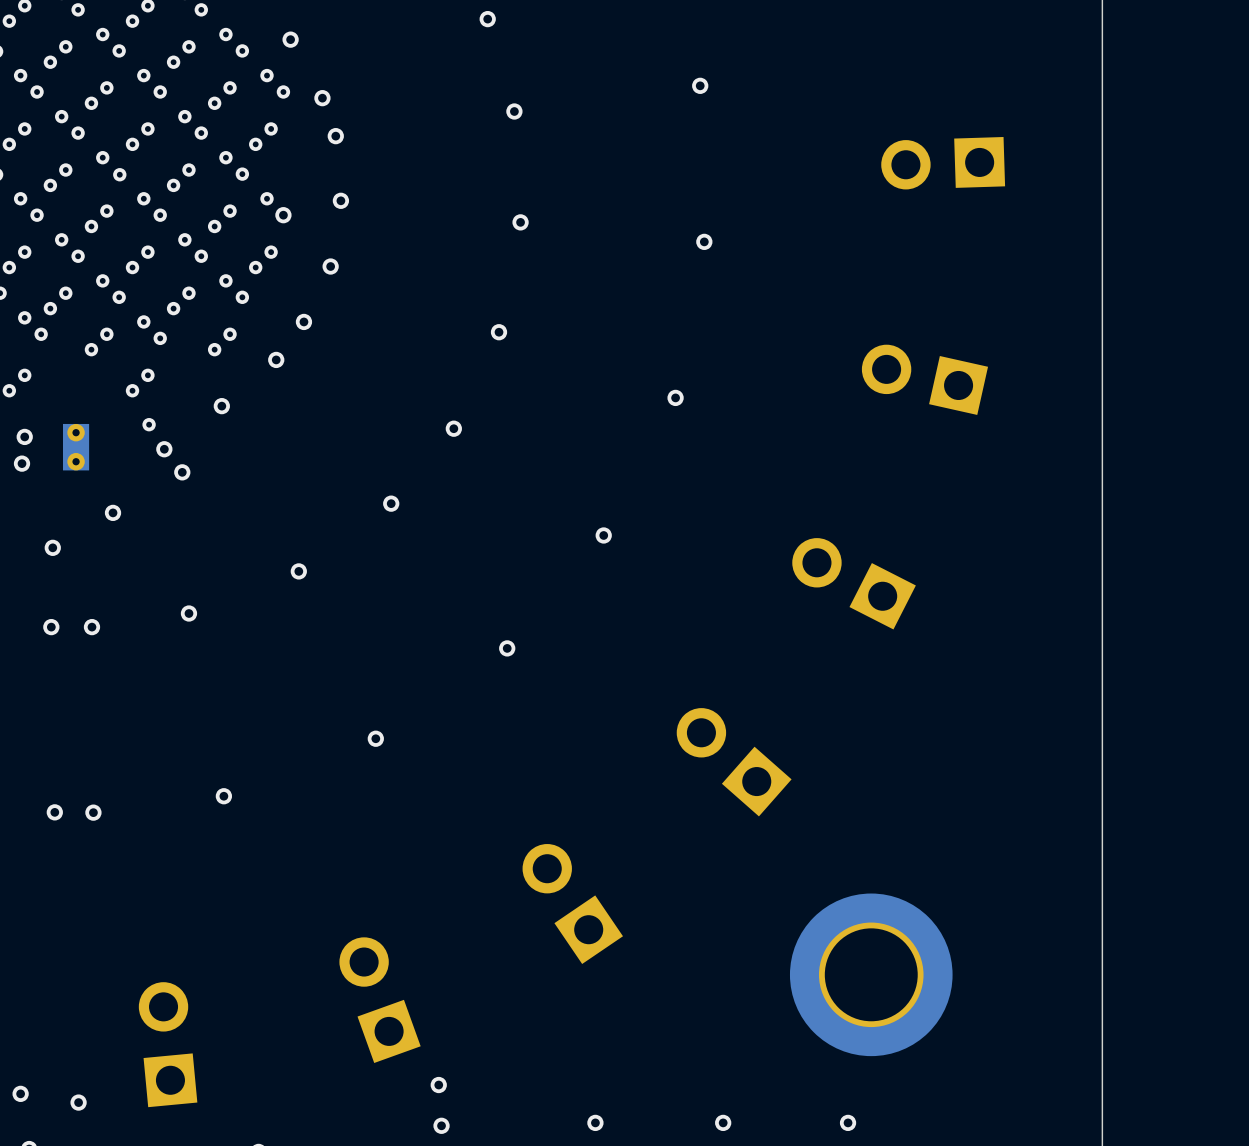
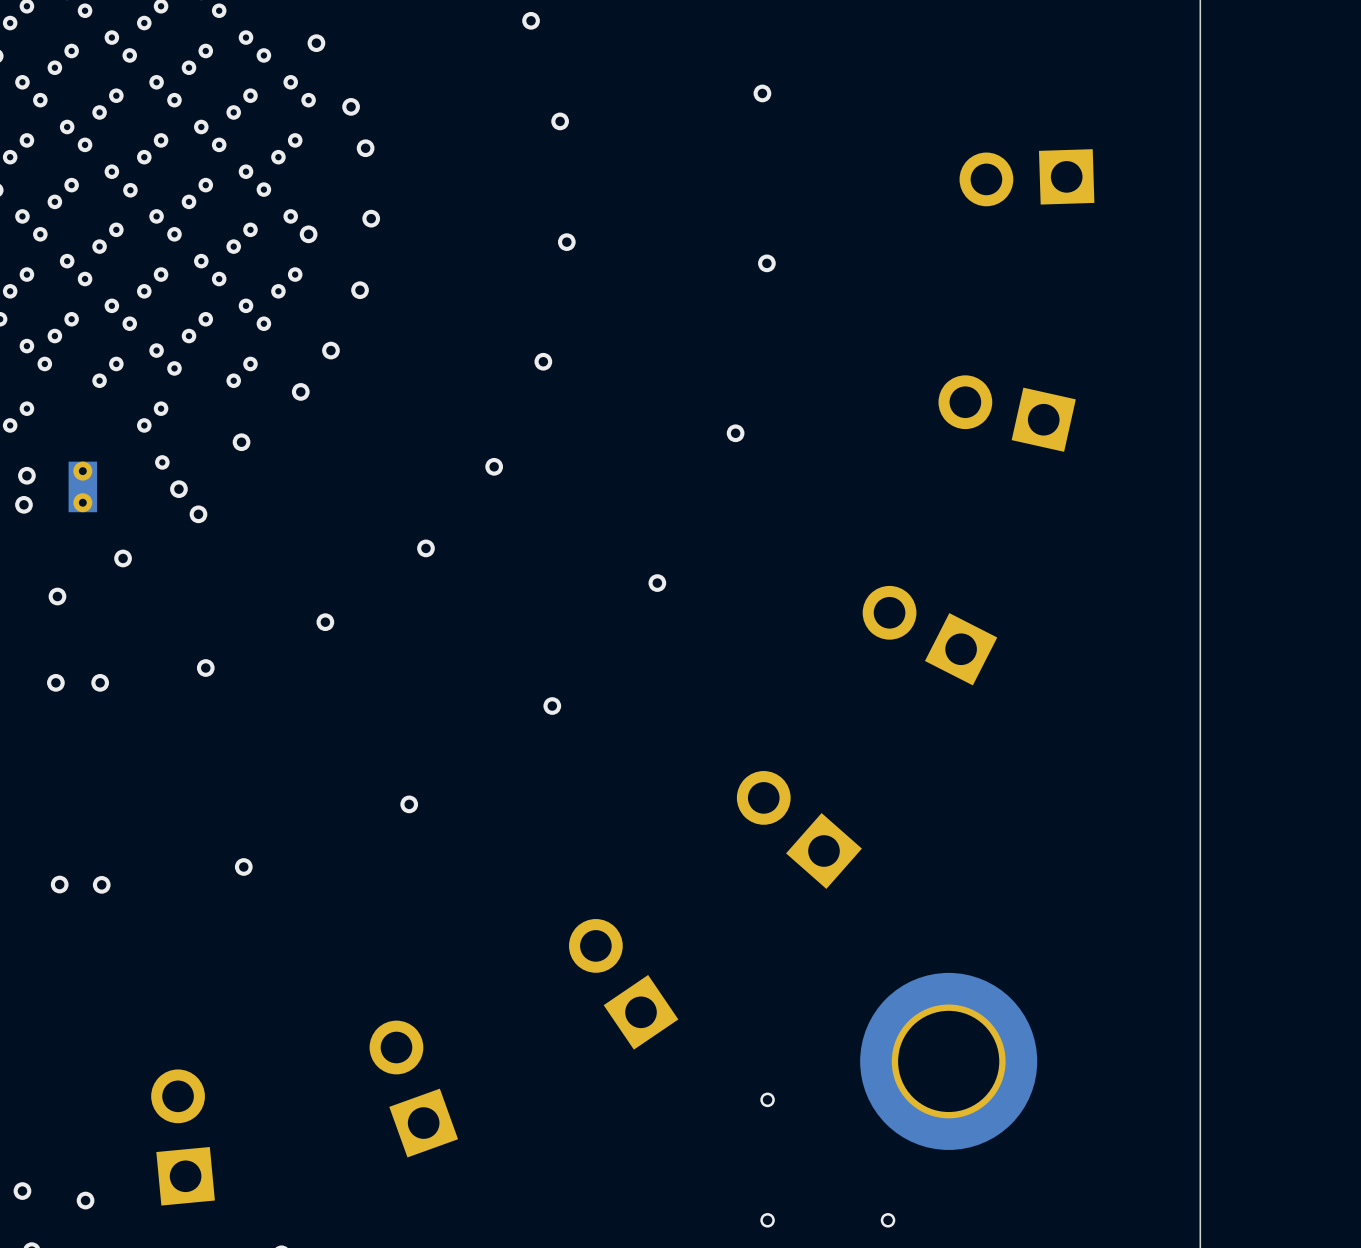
via: none -> (767, 1099)
via: (438, 1085) -> none
via: none -> (767, 1220)
via: none -> (888, 1220)
via: (595, 1122) -> none
via: (723, 1122) -> none
via: (848, 1122) -> none
via: (441, 1125) -> none

